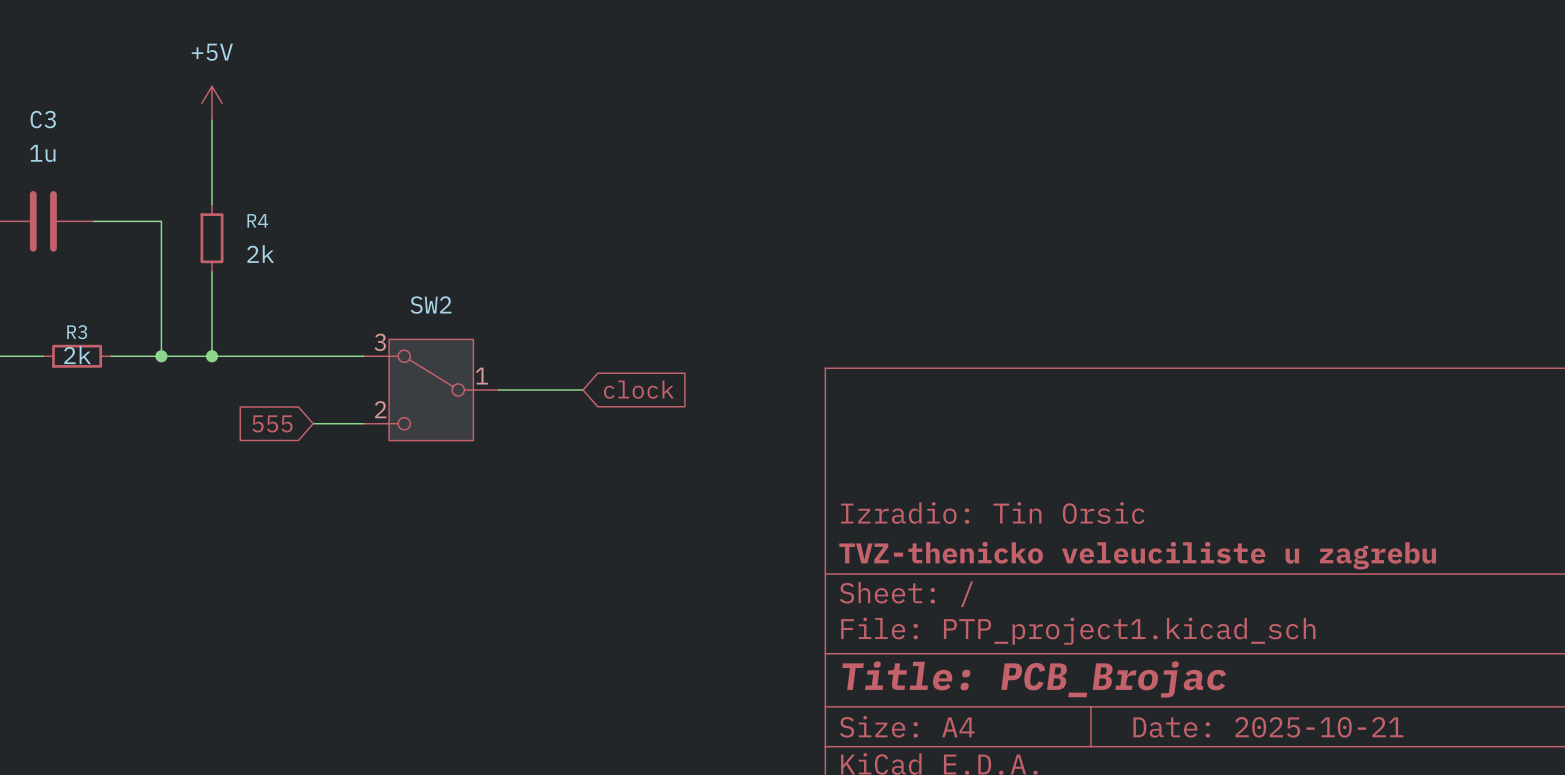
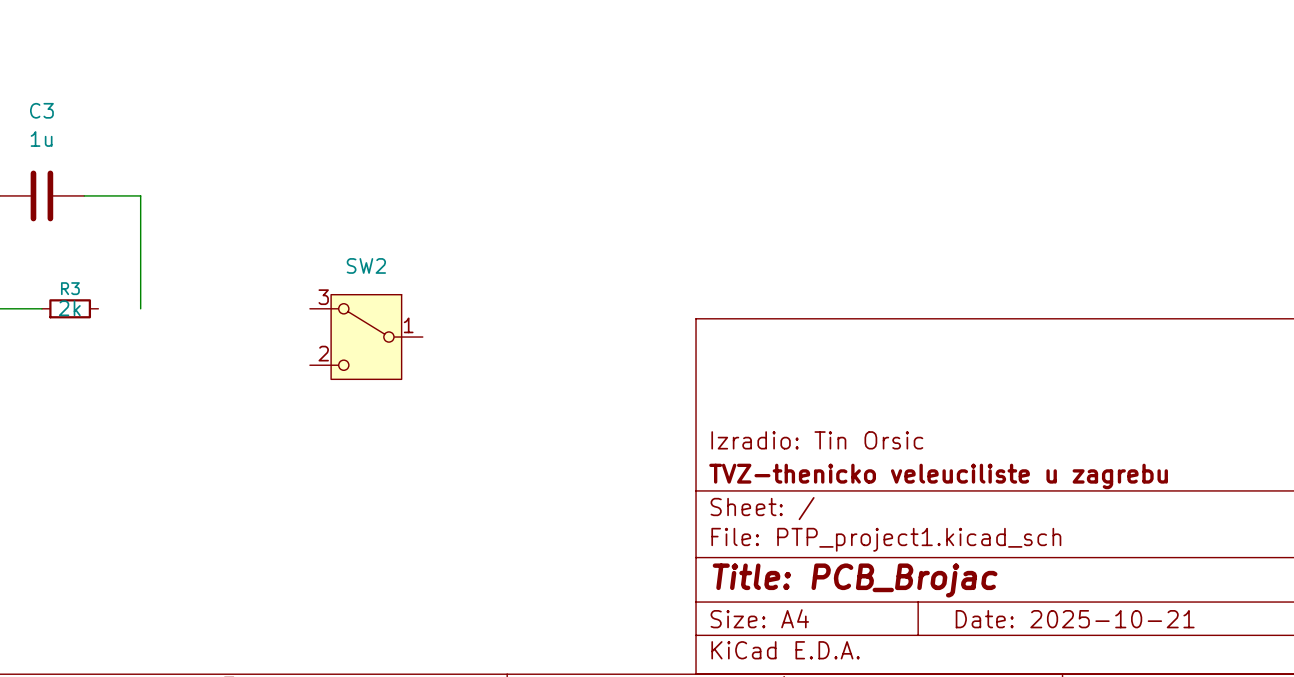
power symbol: +5V (212, 103) -> none
wire: (212, 120) (212, 204) -> none
R4: 2k (212, 238) -> none
wire: (212, 271) (212, 356) -> none
wire: (110, 356) (363, 356) -> none
junction: (161, 356) -> none
junction: (212, 356) -> none
global label: clock (638, 389) -> none
wire: (498, 390) (583, 390) -> none
global label: 555 (272, 423) -> none
wire: (313, 423) (363, 423) -> none

